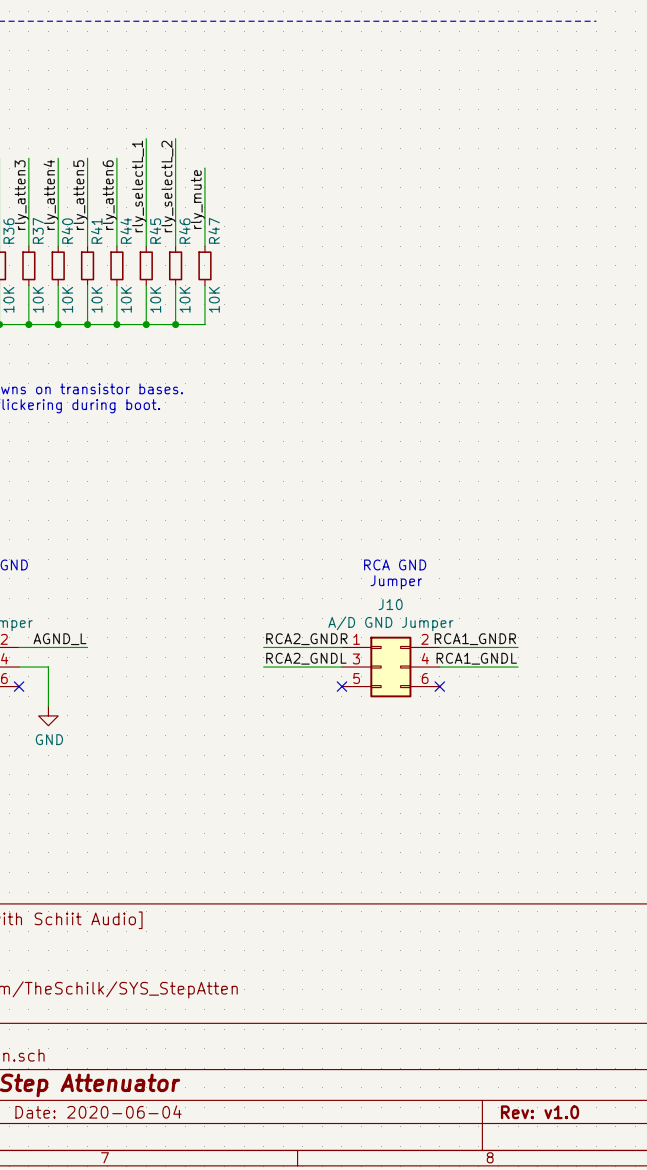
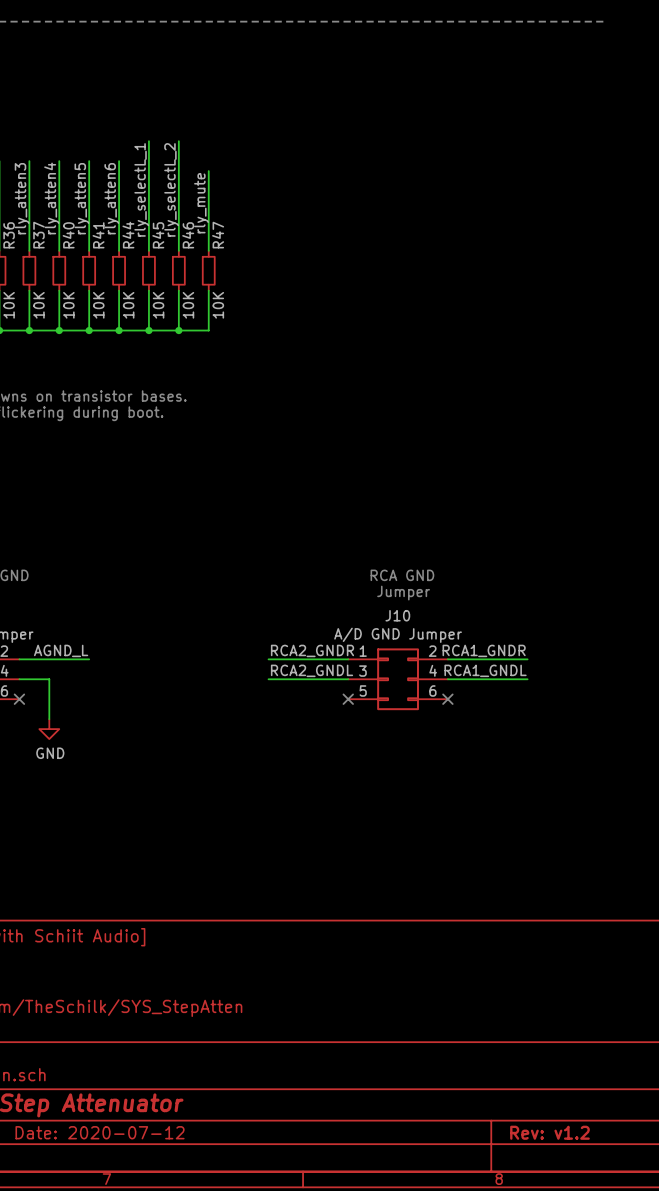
title block: Date: 2020-06-04 (98, 1112) -> Date: 2020-07-12 (100, 1132)
title block: Rev: v1.0 (540, 1112) -> Rev: v1.2 (549, 1132)

